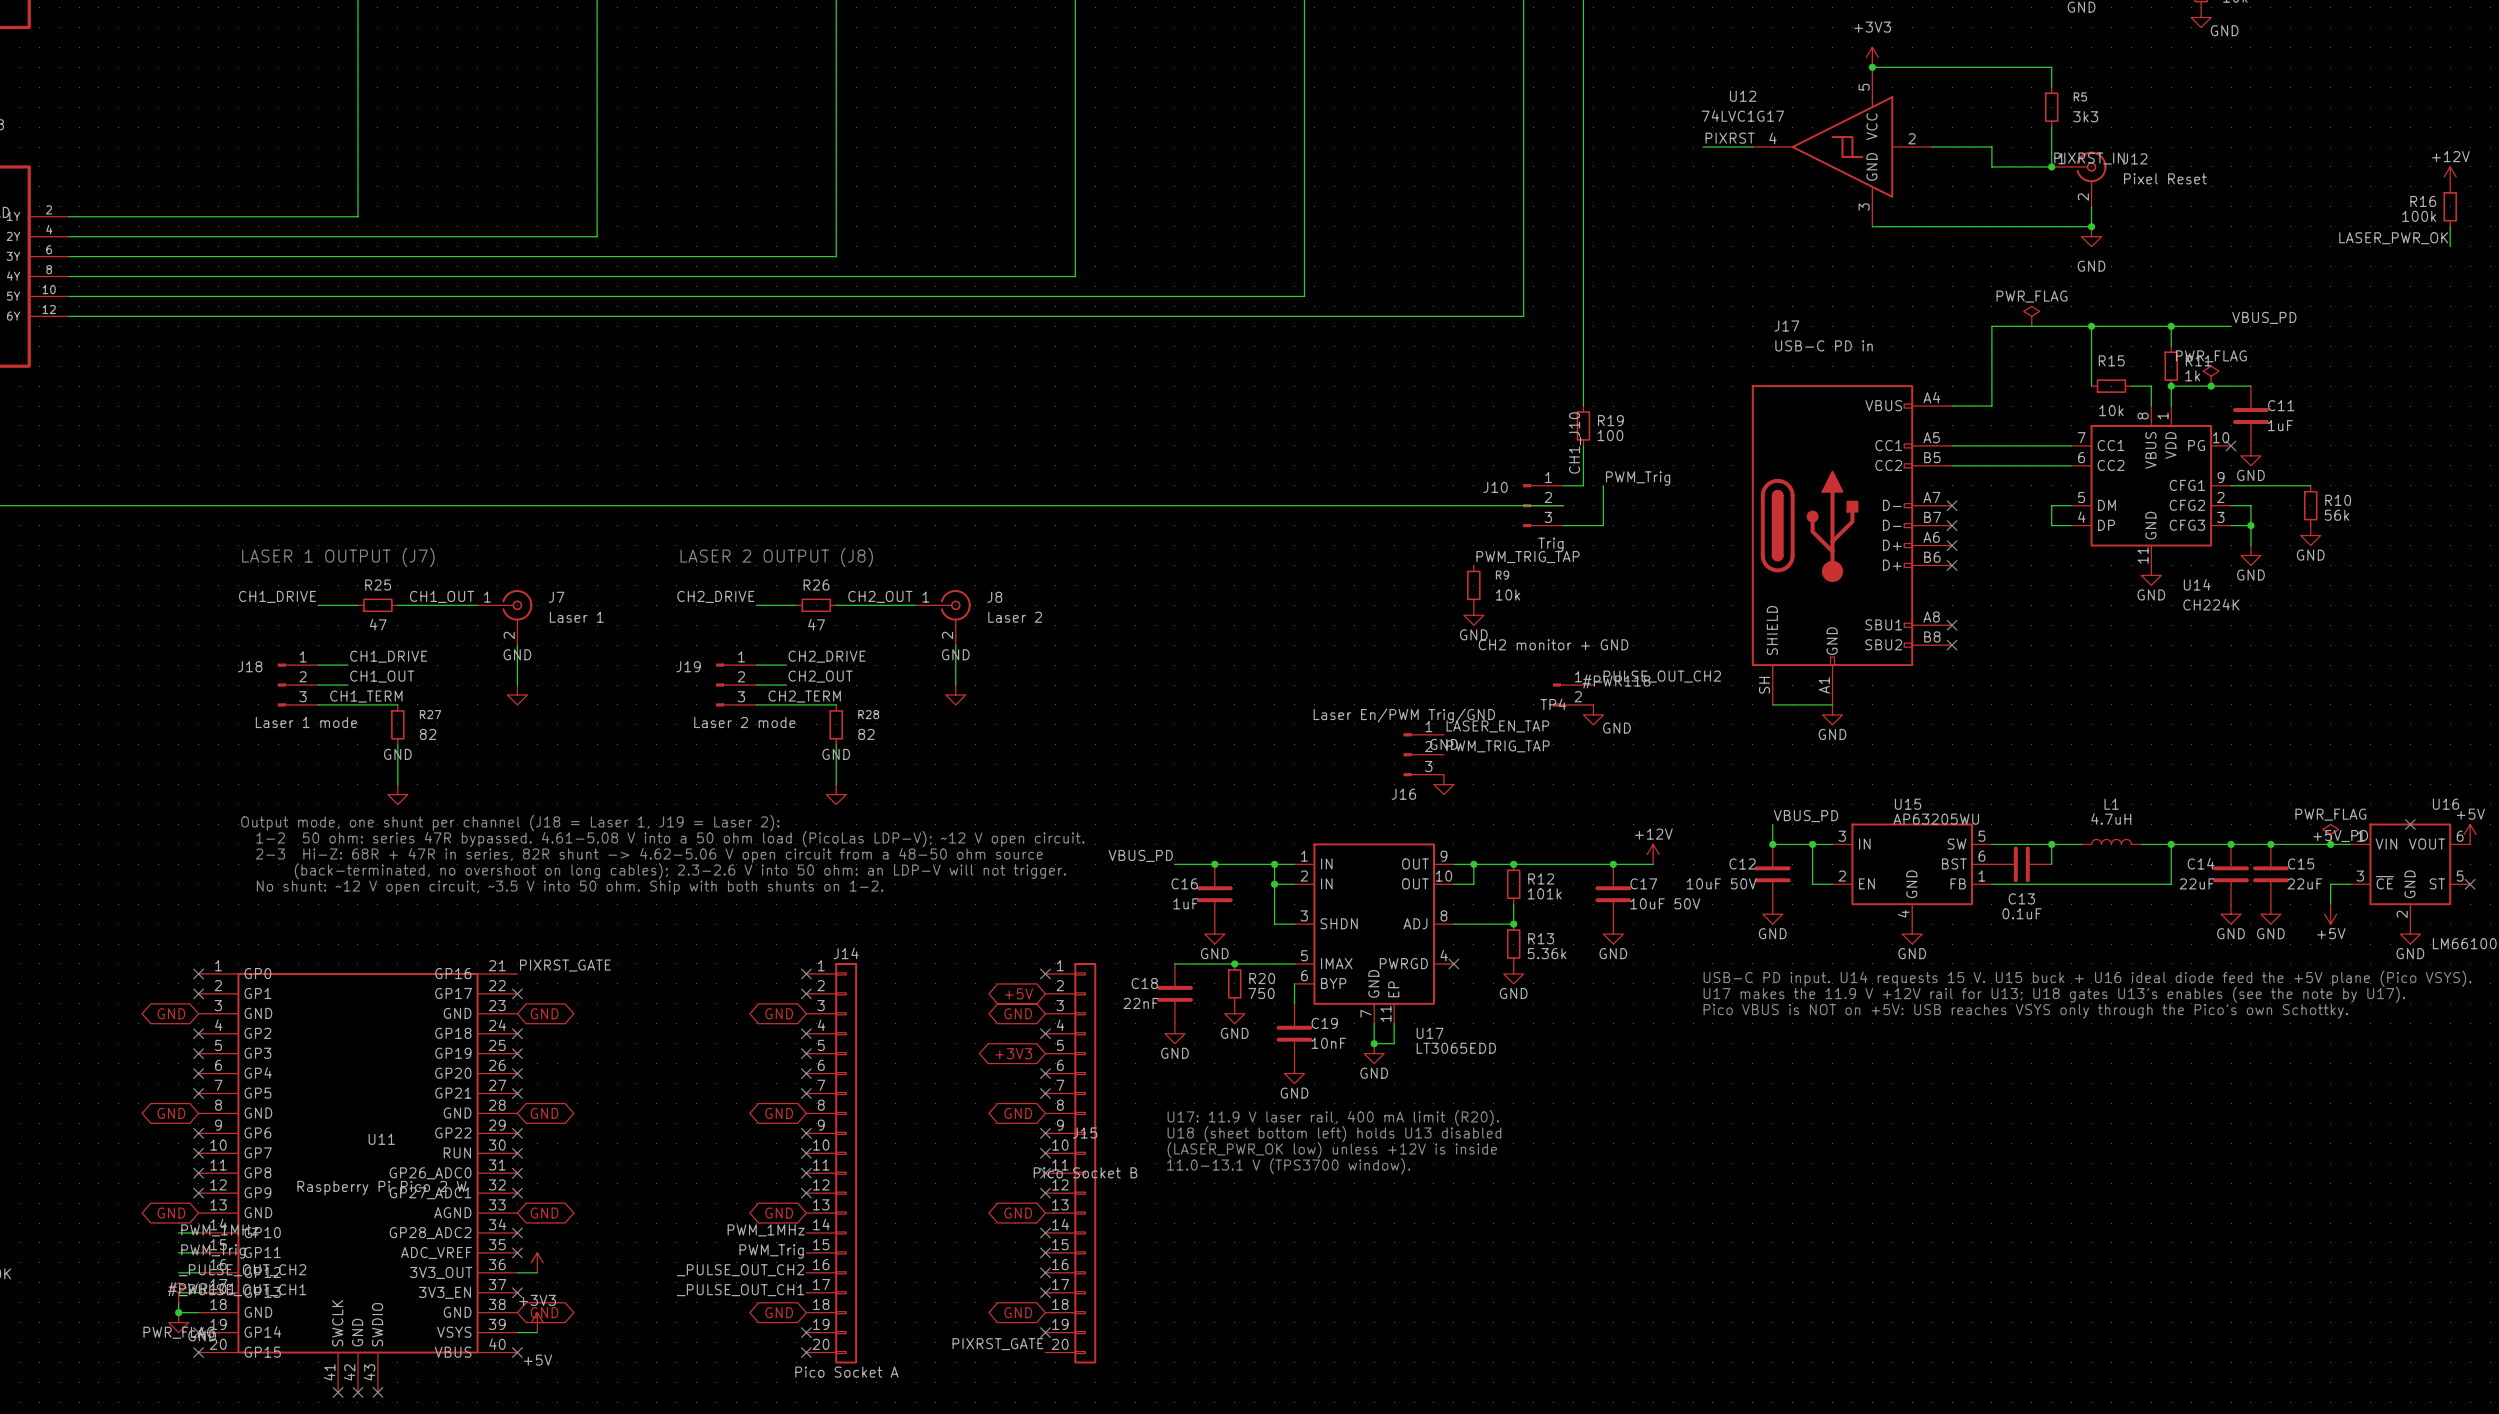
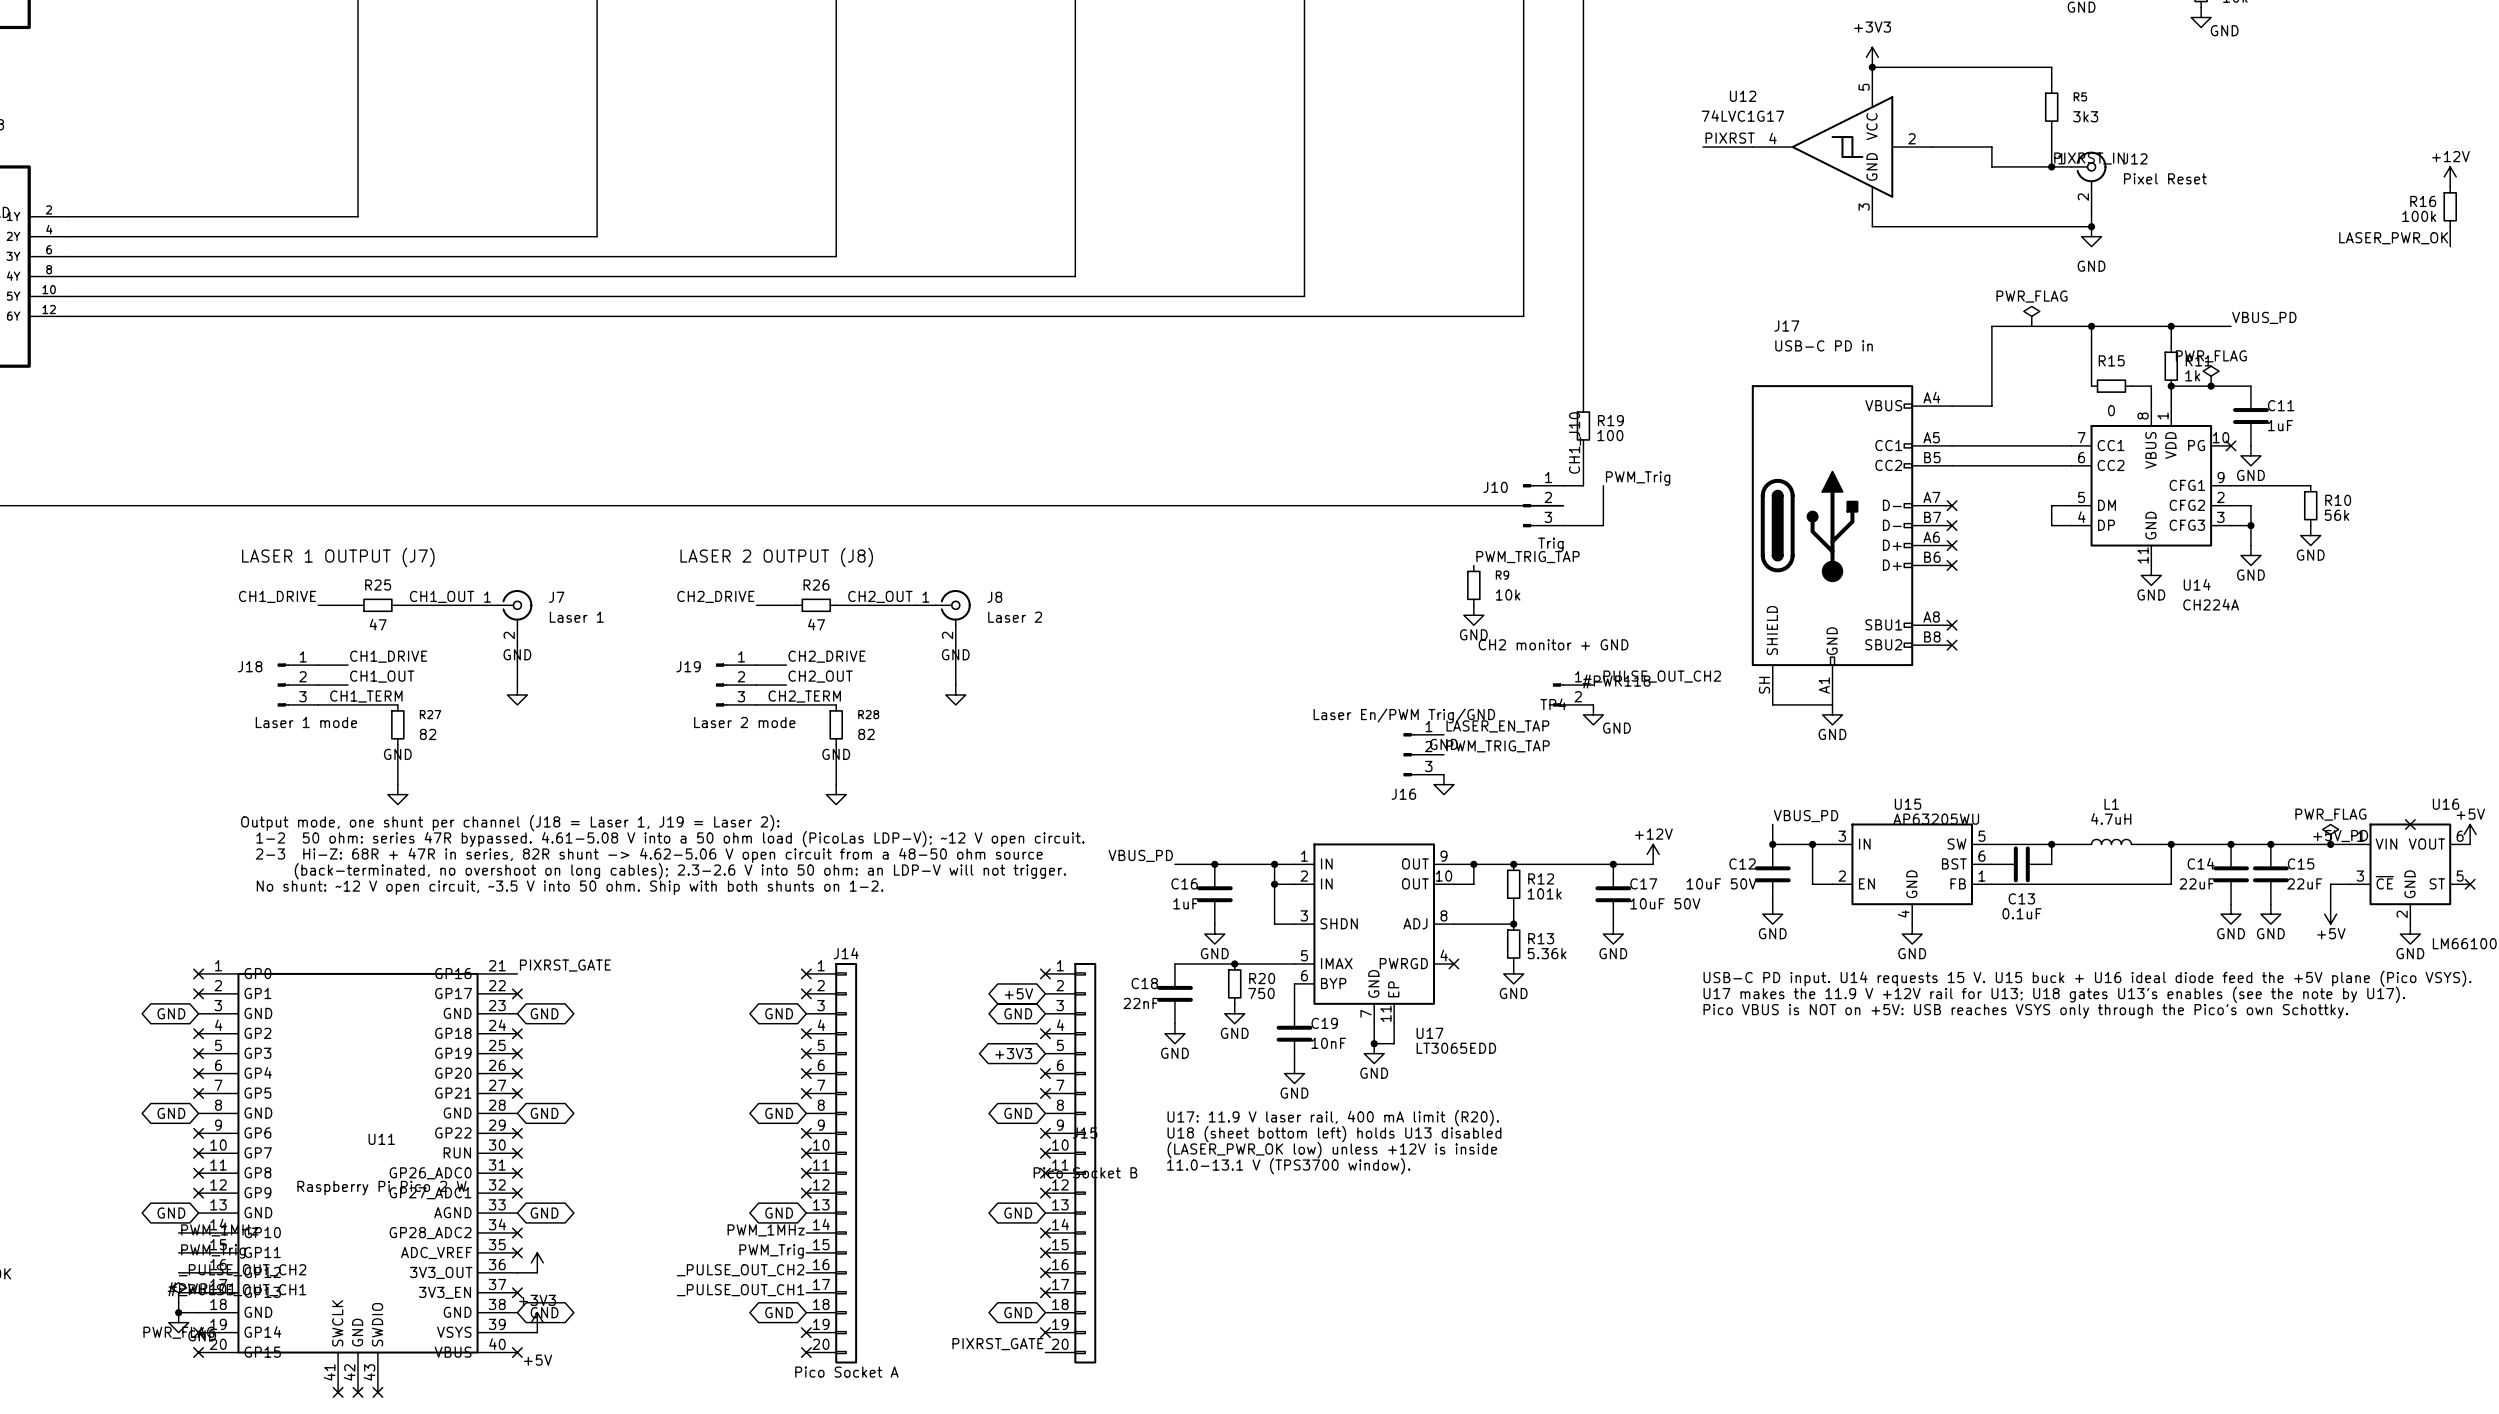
R15 value: 10k (2111, 410) -> 0 (2111, 410)
U14 value: CH224K (2211, 604) -> CH224A (2211, 604)

